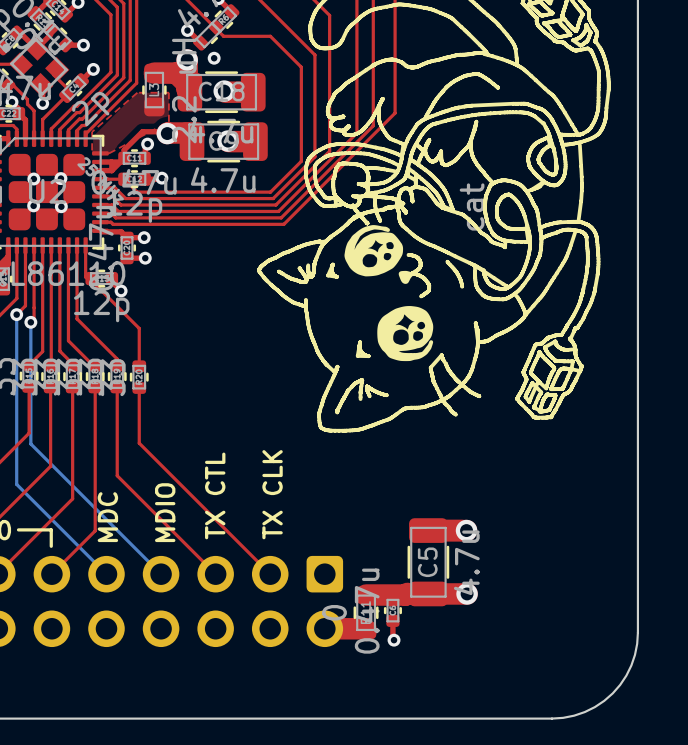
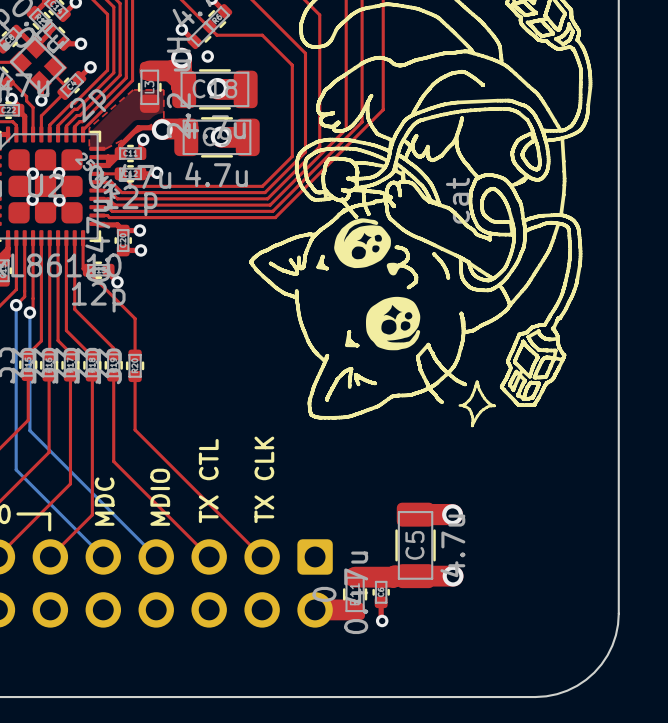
drawing: none -> [458, 380, 496, 428]

